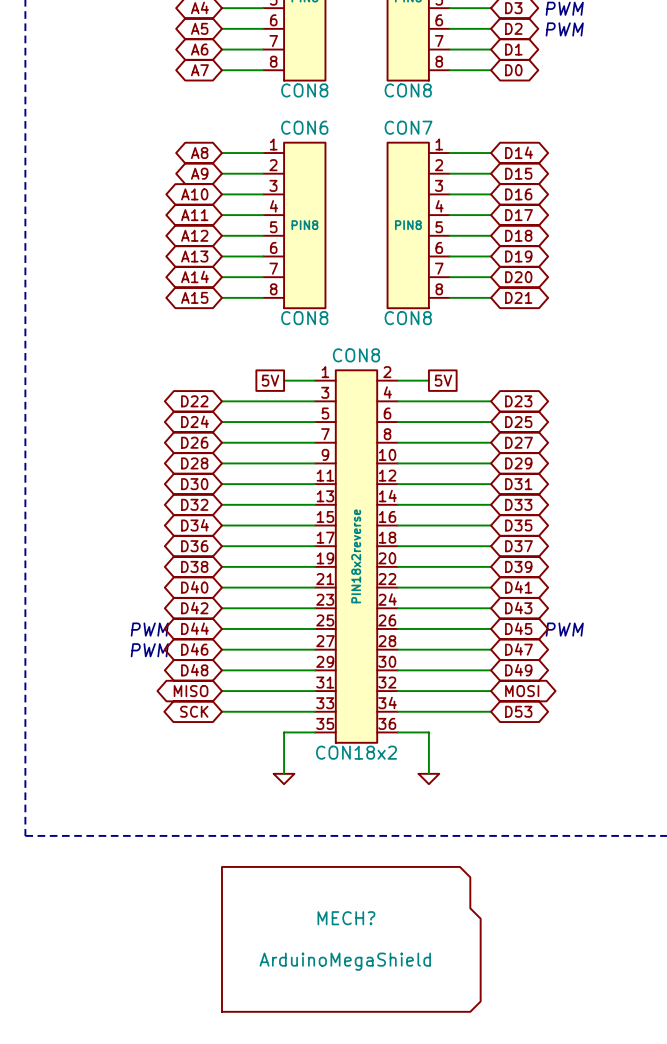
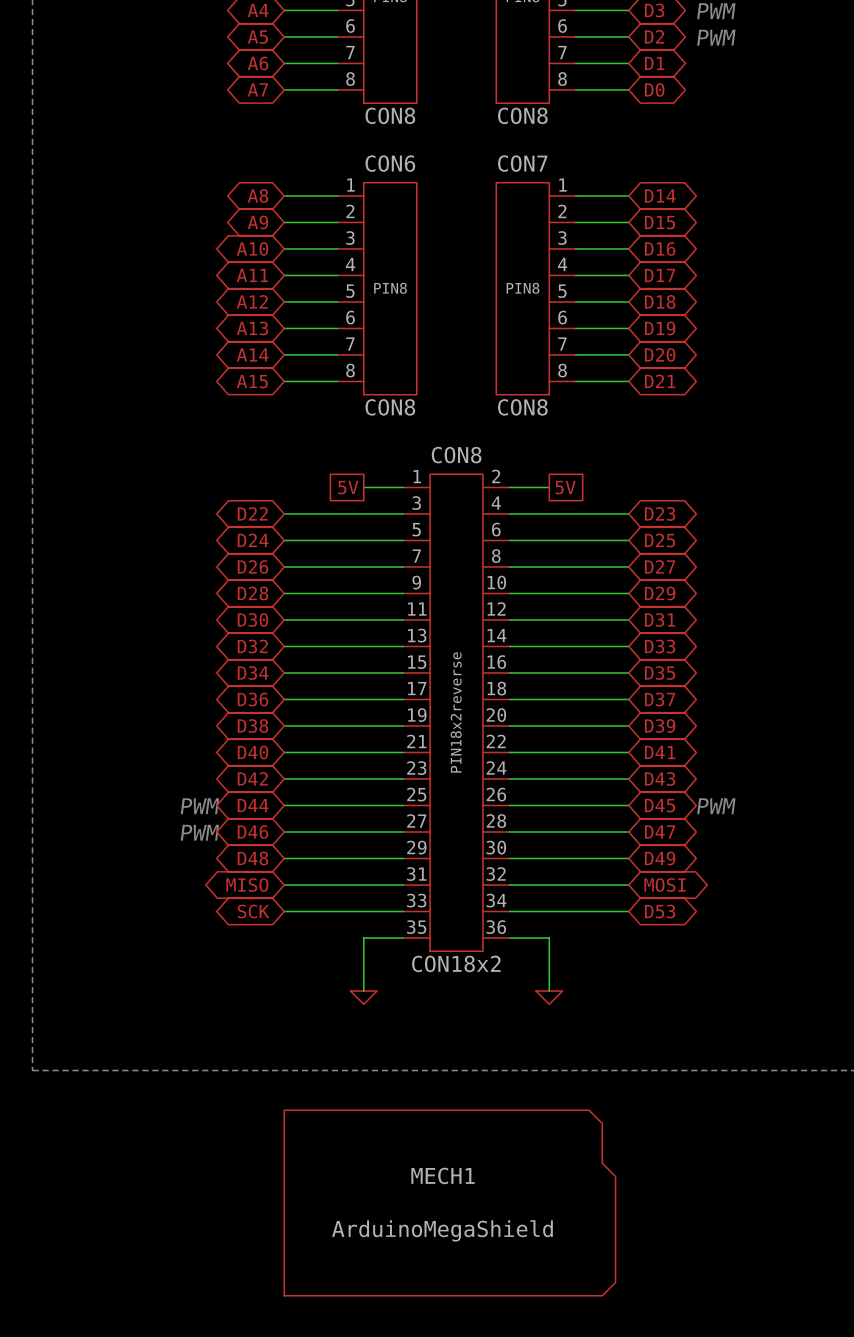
MECH? name: MECH? (346, 918) -> MECH1 (443, 1175)

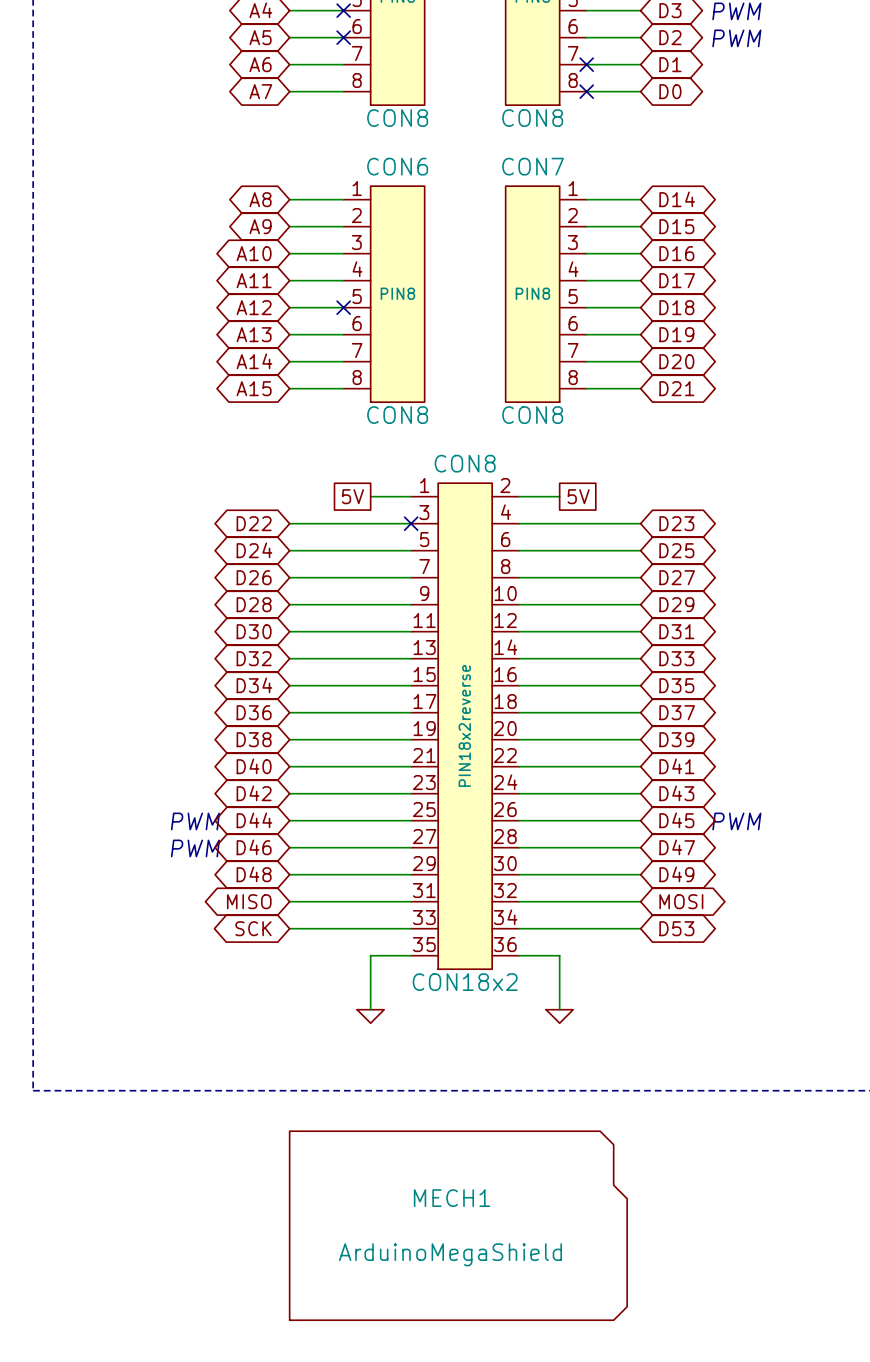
no-connect mark: none -> (343, 10)
no-connect mark: none -> (343, 37)
no-connect mark: none -> (586, 64)
no-connect mark: none -> (586, 91)
no-connect mark: none -> (343, 307)
no-connect mark: none -> (411, 523)

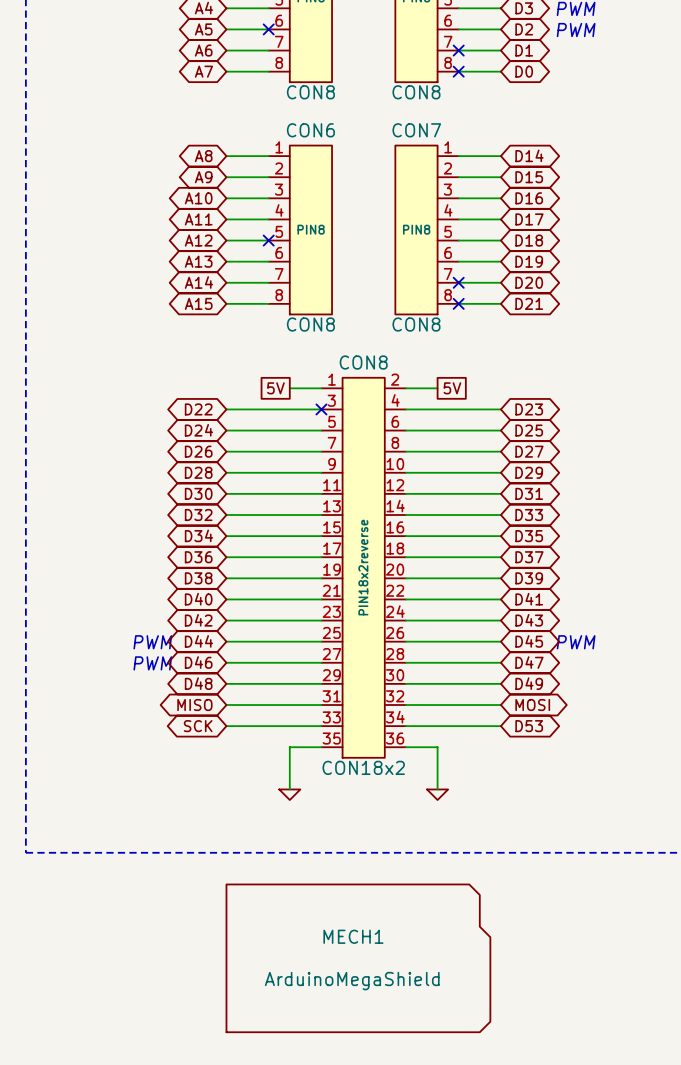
no-connect mark: (343, 10) -> none
no-connect mark: none -> (458, 282)
no-connect mark: none -> (458, 303)

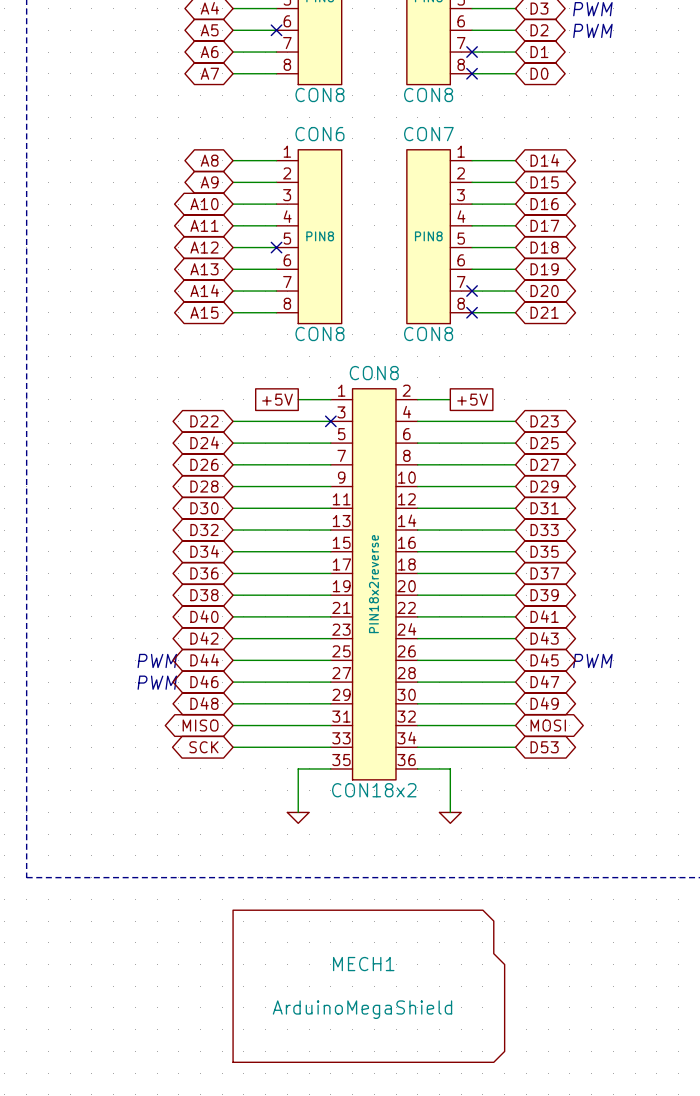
global label: 5V (275, 388) -> +5V (277, 399)
global label: 5V (452, 388) -> +5V (472, 399)

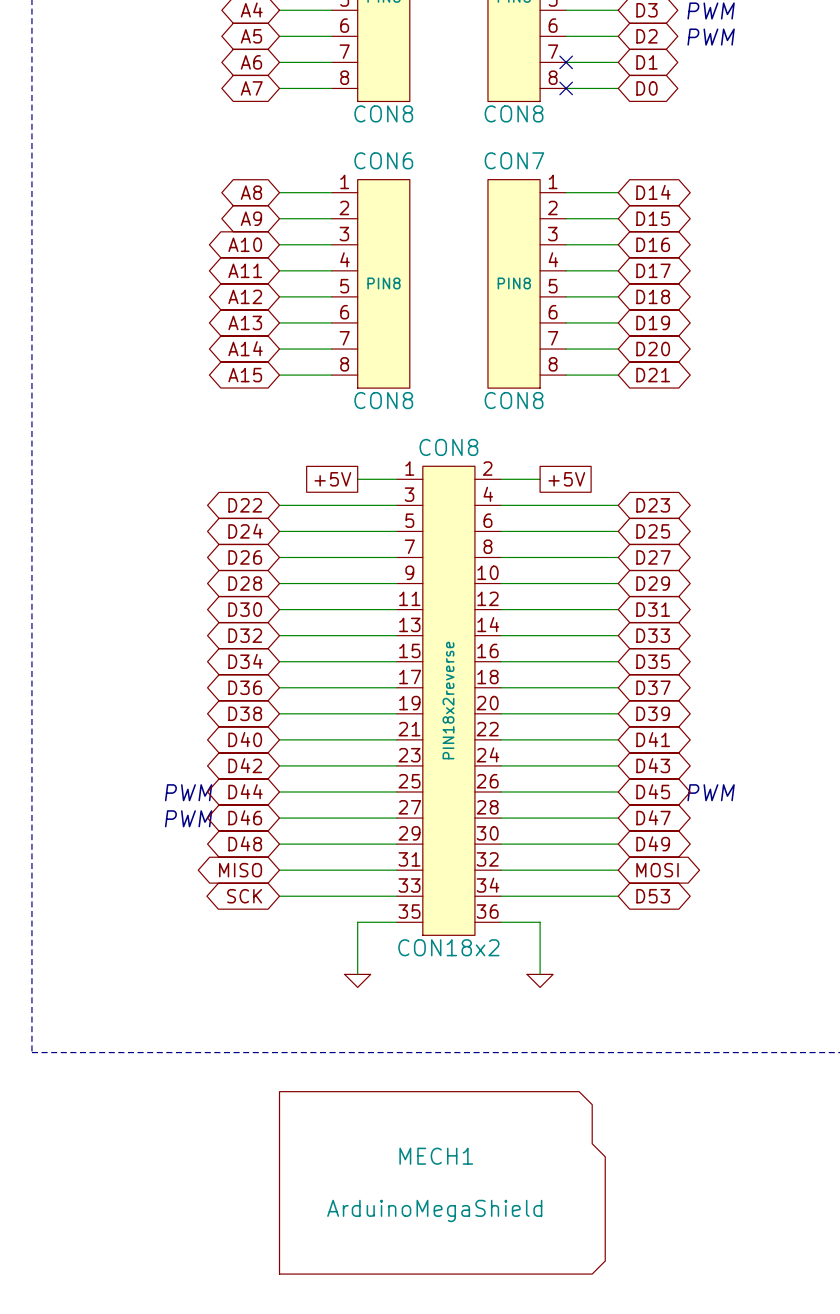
no-connect mark: (276, 30) -> none
no-connect mark: (276, 247) -> none
no-connect mark: (472, 291) -> none
no-connect mark: (472, 312) -> none
no-connect mark: (330, 421) -> none

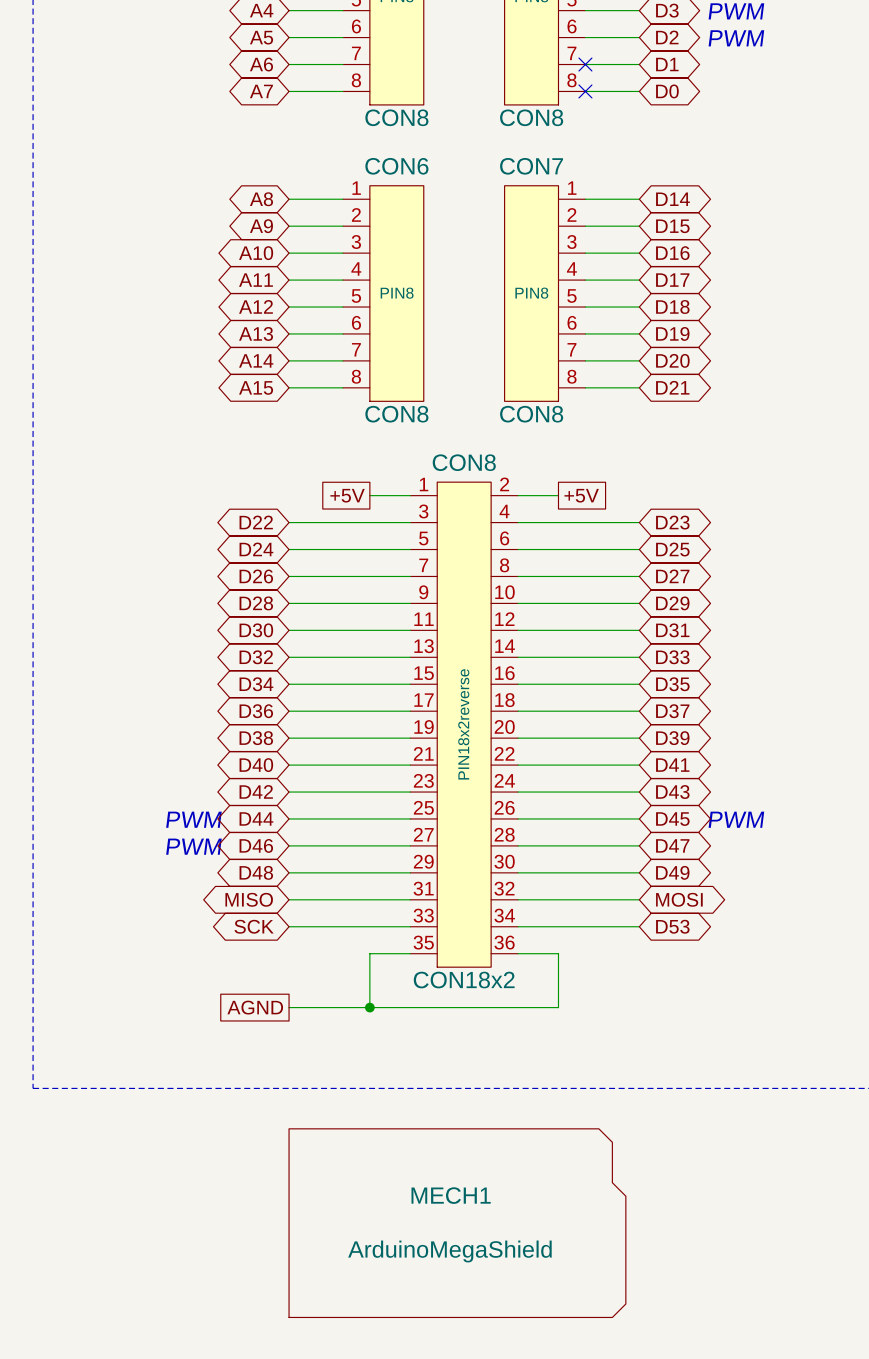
global label: none -> AGND (255, 1007)
wire: none -> (289, 1007) (558, 1007)
junction: none -> (369, 1007)
power symbol: (357, 980) -> none
power symbol: (540, 980) -> none

